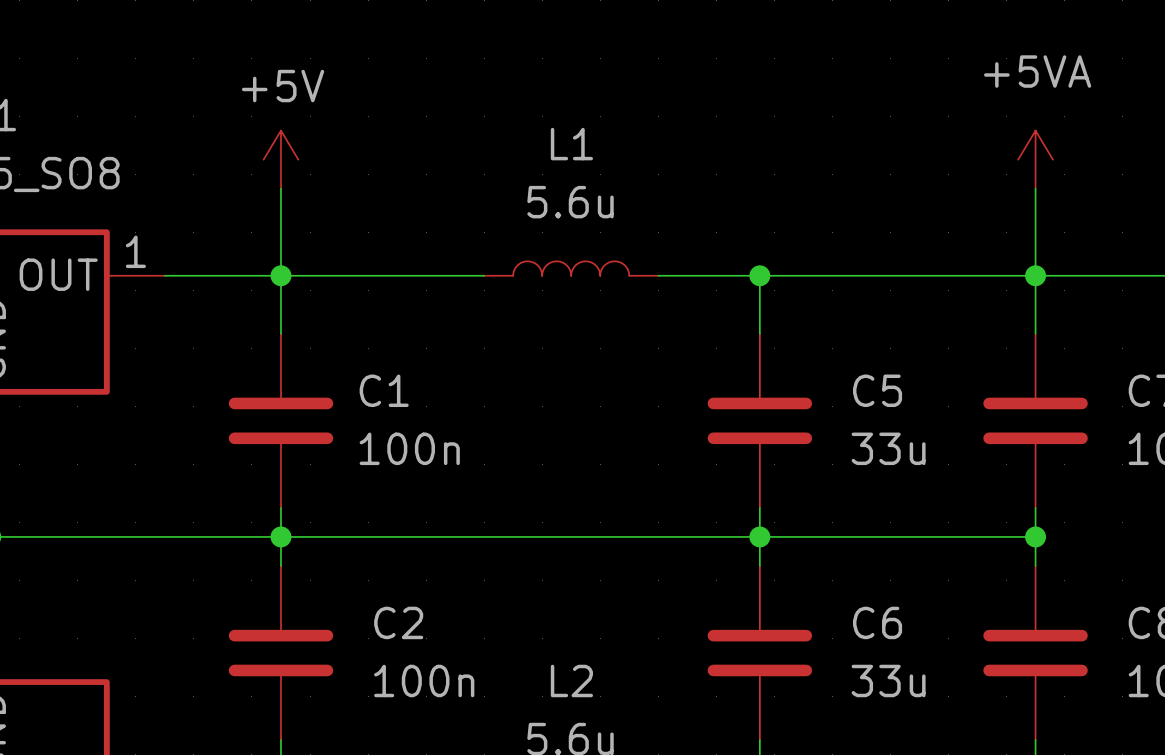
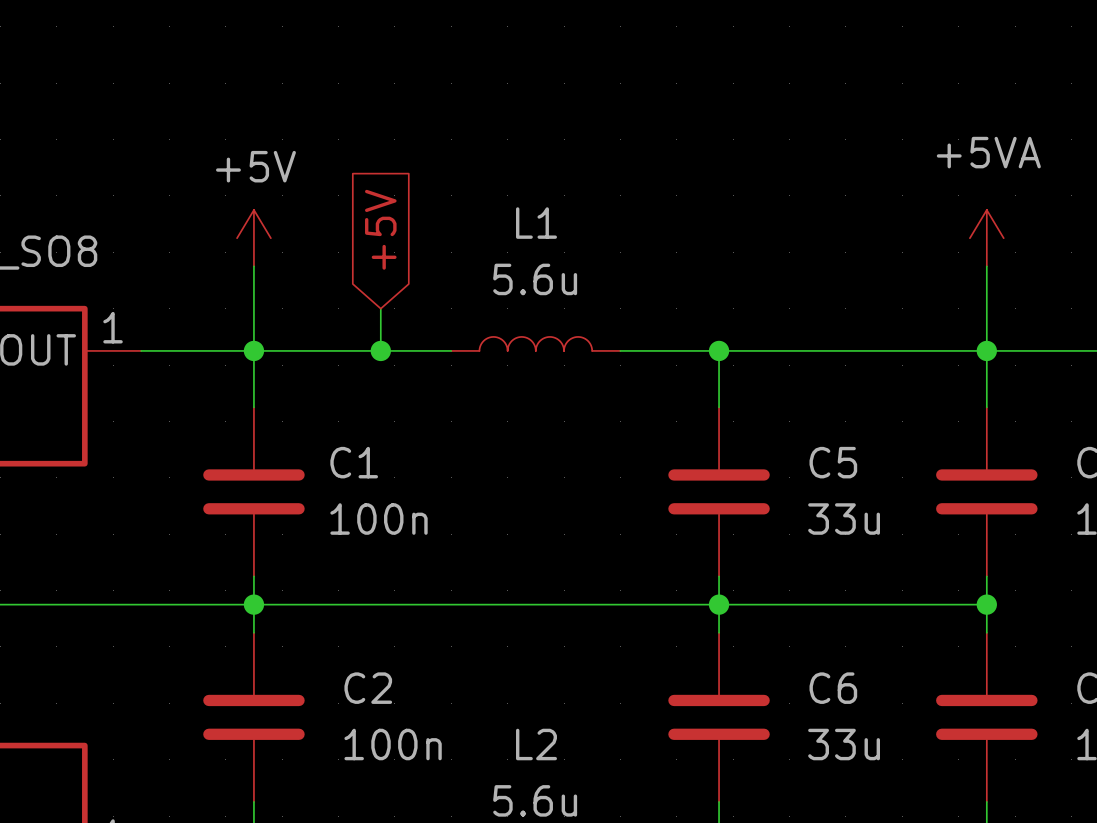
global label: none -> +5V (380, 229)
wire: none -> (380, 308) (380, 350)
junction: none -> (380, 350)

